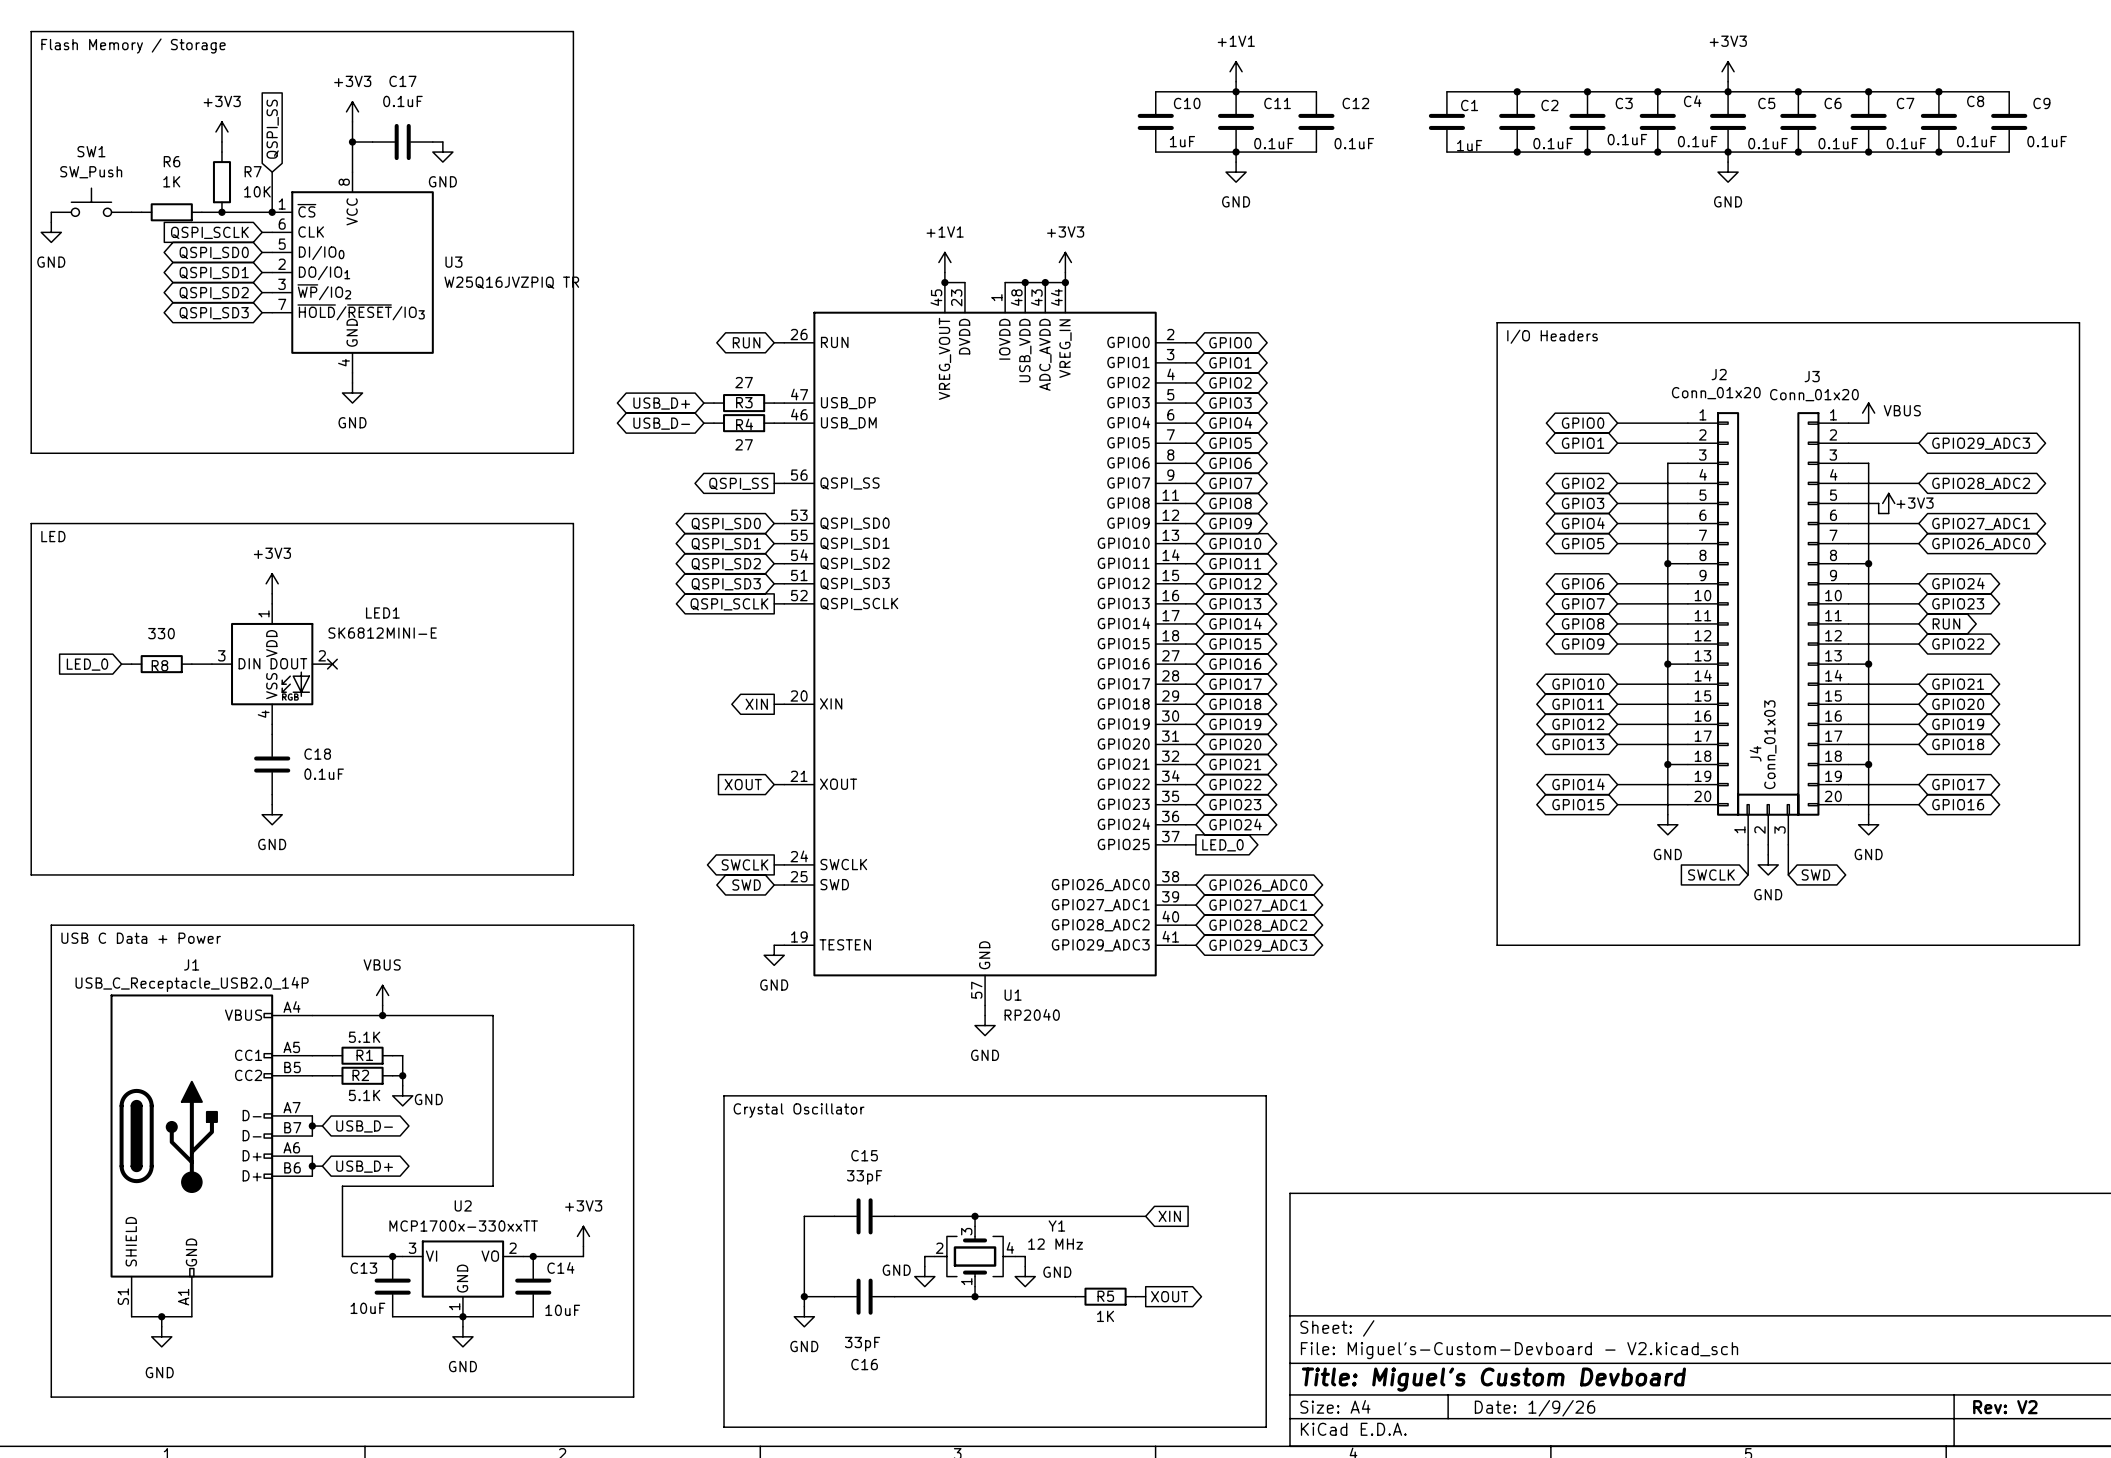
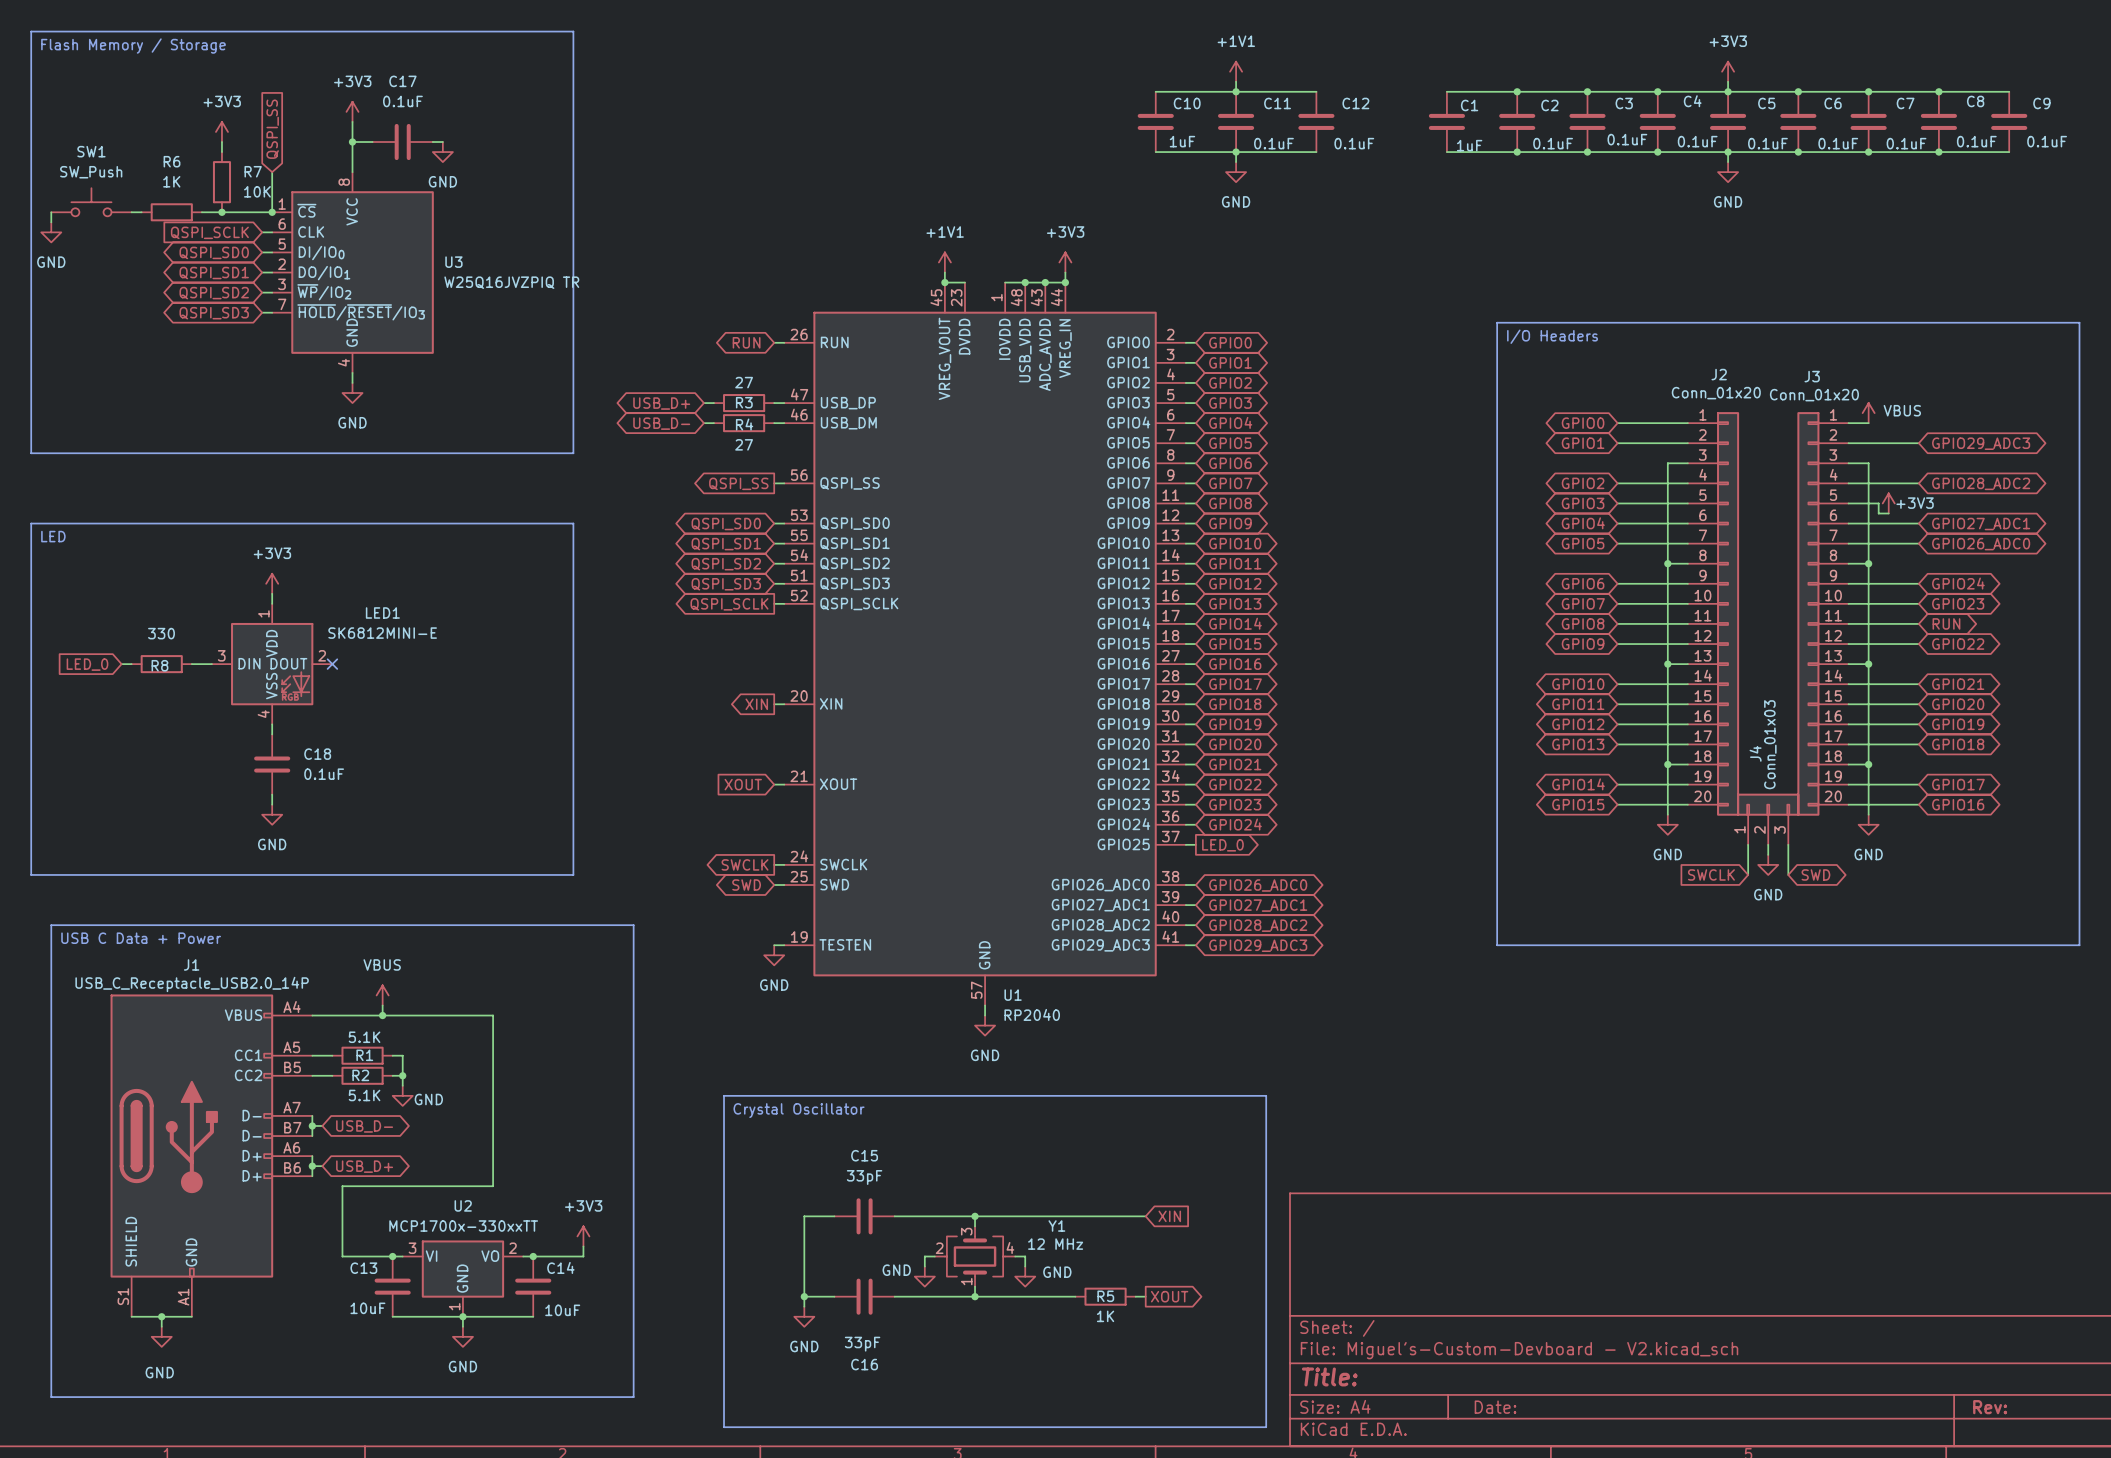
title block: Title: Miguel's Custom Devboard (1493, 1379) -> Title: (1329, 1376)
title block: Rev: V2 (2005, 1407) -> Rev: (1990, 1407)
title block: Date: 1/9/26 (1535, 1408) -> Date: (1495, 1407)

